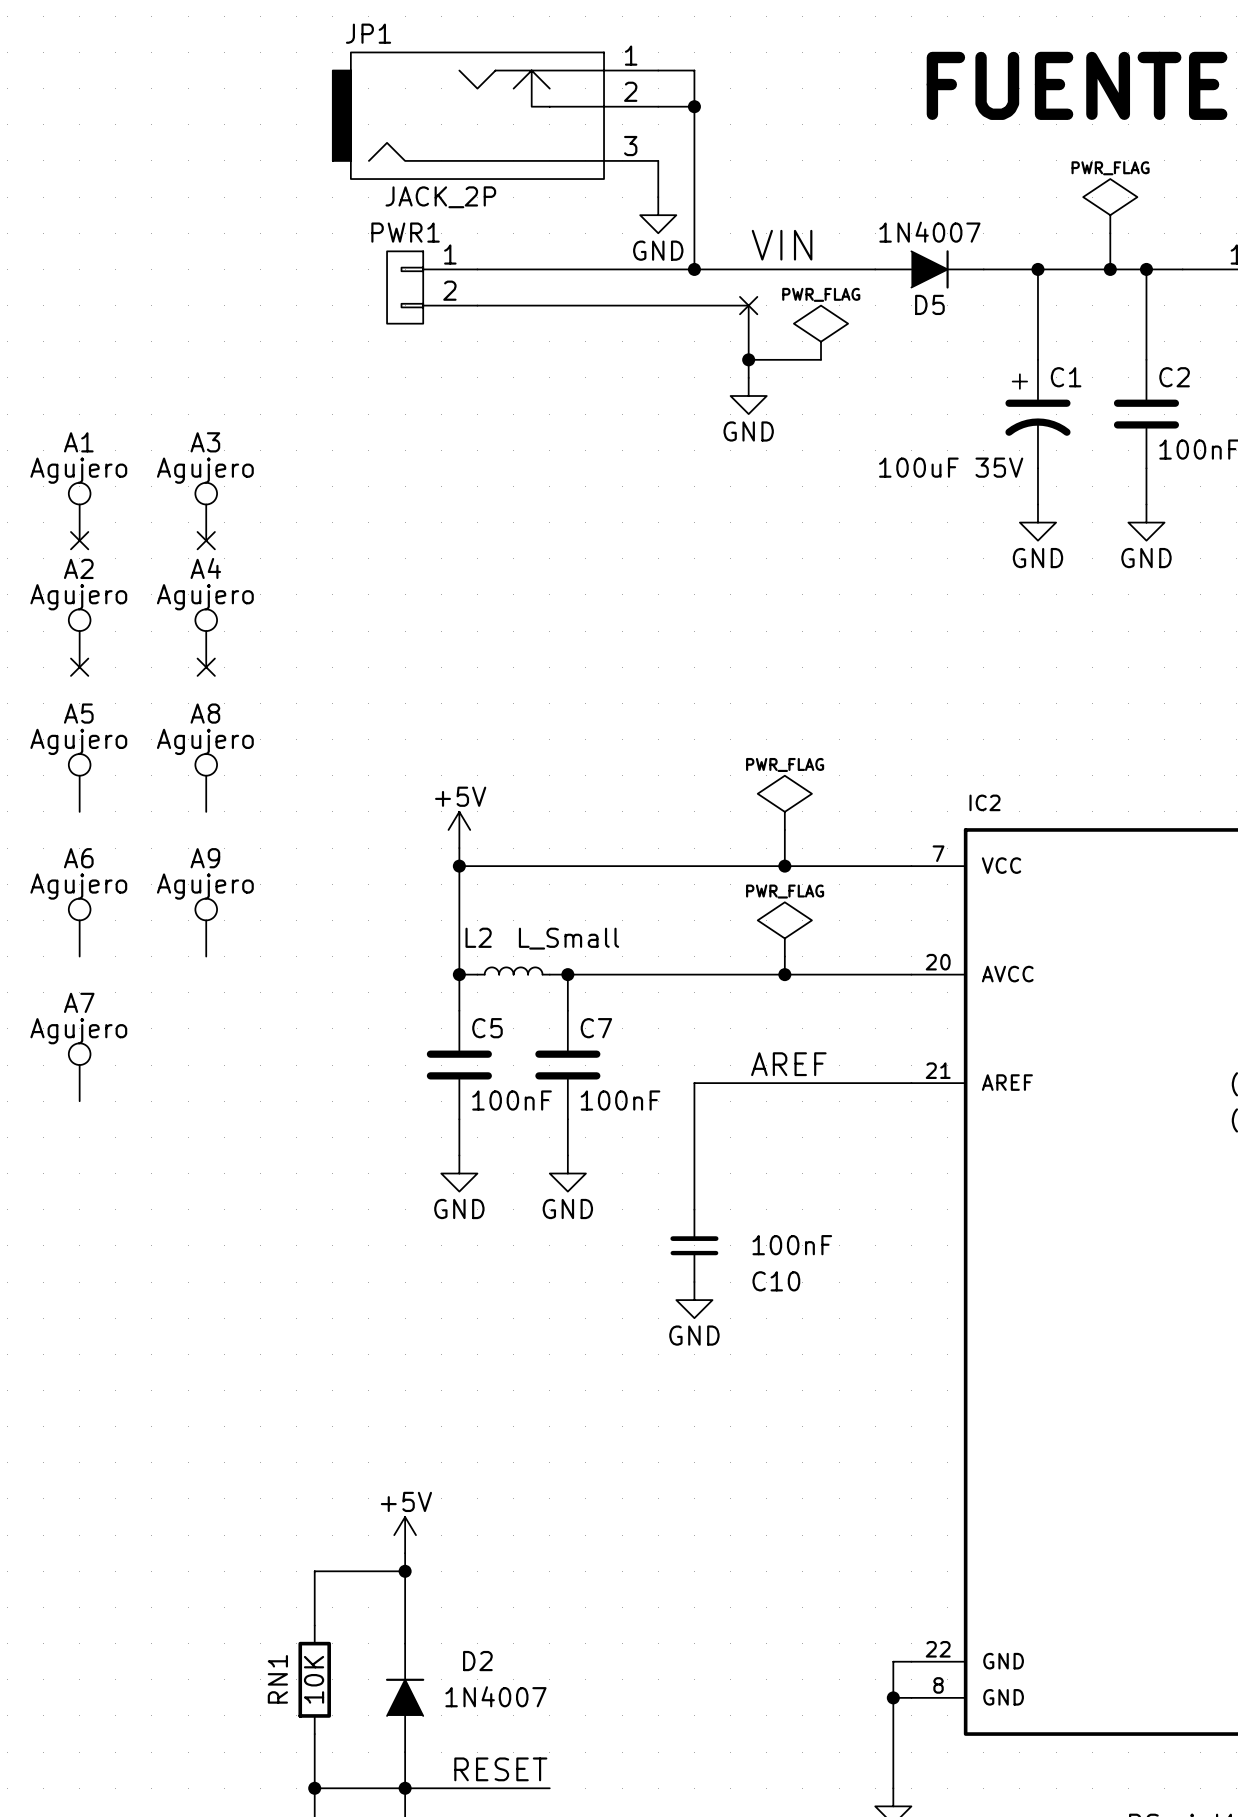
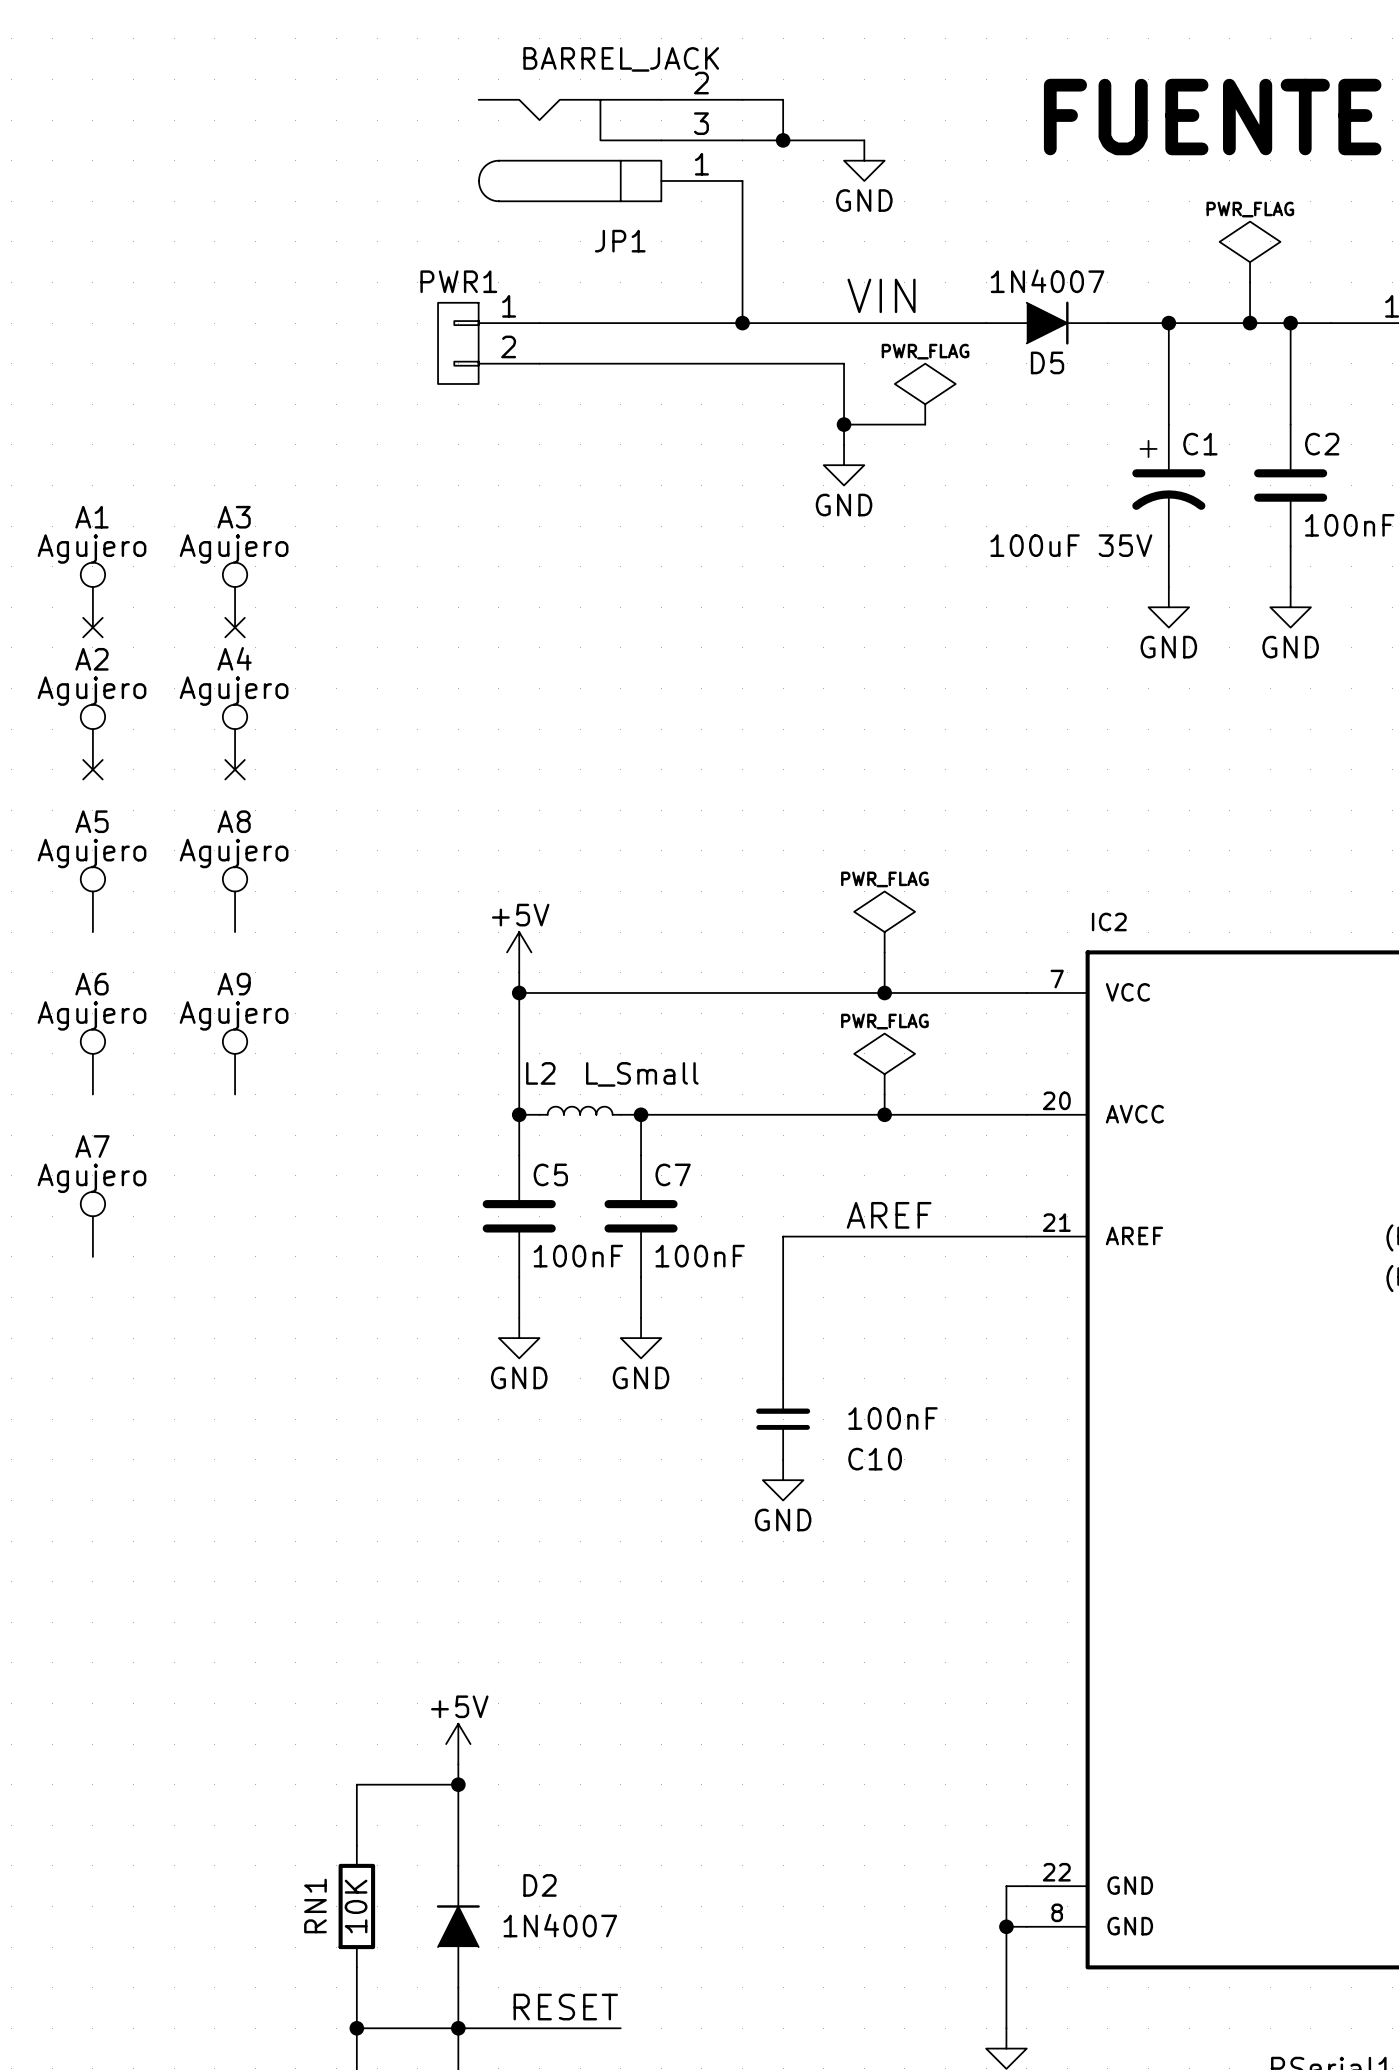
JP1 name position: JP1 (368, 33) -> JP1 (620, 241)
JP1 symbol: [332, 52, 659, 180] -> [478, 99, 743, 202]
wire: (694, 106) (694, 269) -> (783, 140) (864, 140)
wire: none -> (742, 180) (742, 201)
JP1 value: JACK_2P (440, 197) -> BARREL_JACK (621, 59)
wire: none -> (742, 241) (742, 323)
power symbol position: GND (658, 215) -> GND (864, 160)
junction position: (694, 269) -> (742, 323)
no-connect mark: (748, 305) -> none

